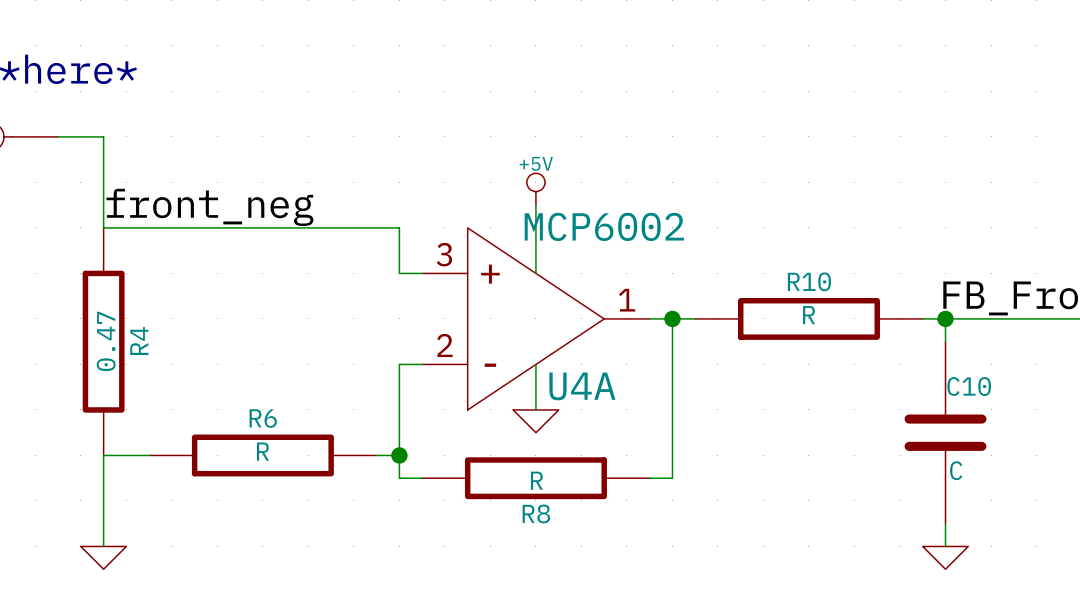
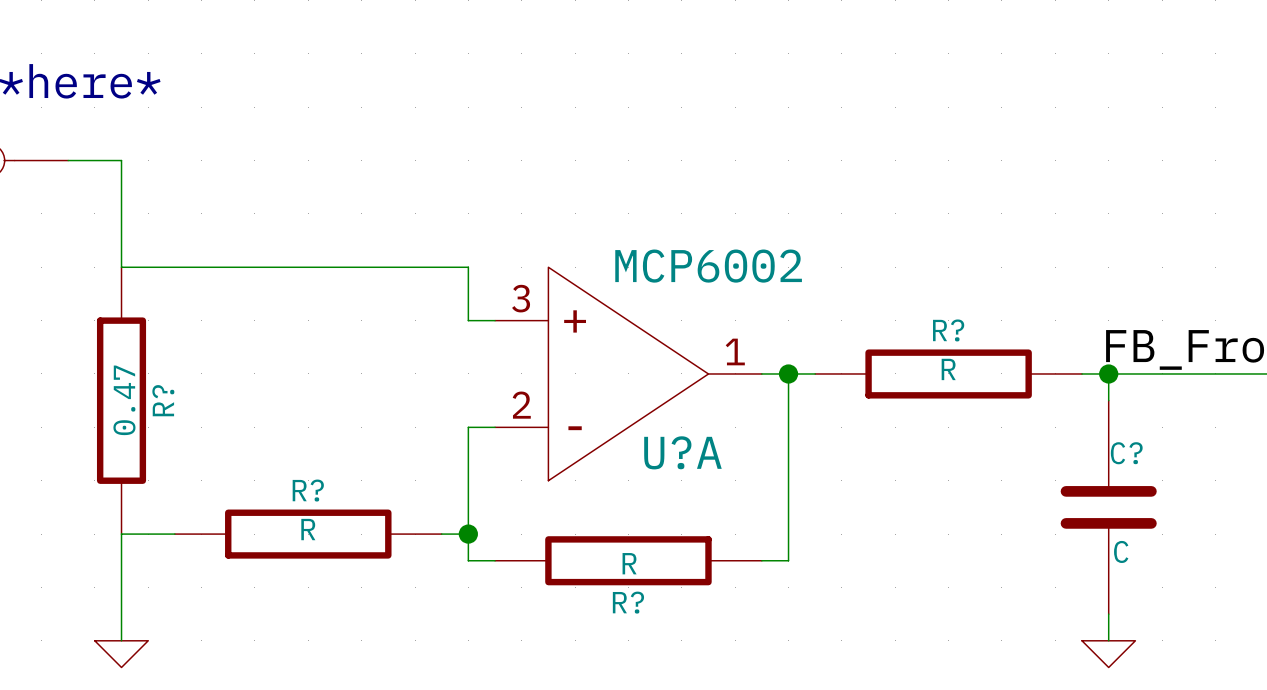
power symbol: +5V (535, 189) -> none
wire: (535, 205) (535, 273) -> none
label: front_neg (209, 207) -> none
R10 name: R10 (809, 281) -> R? (948, 330)
R4 name: R4 (139, 341) -> R? (163, 400)
wire: (535, 364) (535, 409) -> none
U4A name: U4A (582, 386) -> U?A (682, 452)
C10 name: C10 (969, 386) -> C? (1126, 453)
R6 name: R6 (263, 418) -> R? (308, 490)
power symbol: (535, 421) -> none
R8 name: R8 (536, 513) -> R? (628, 602)

